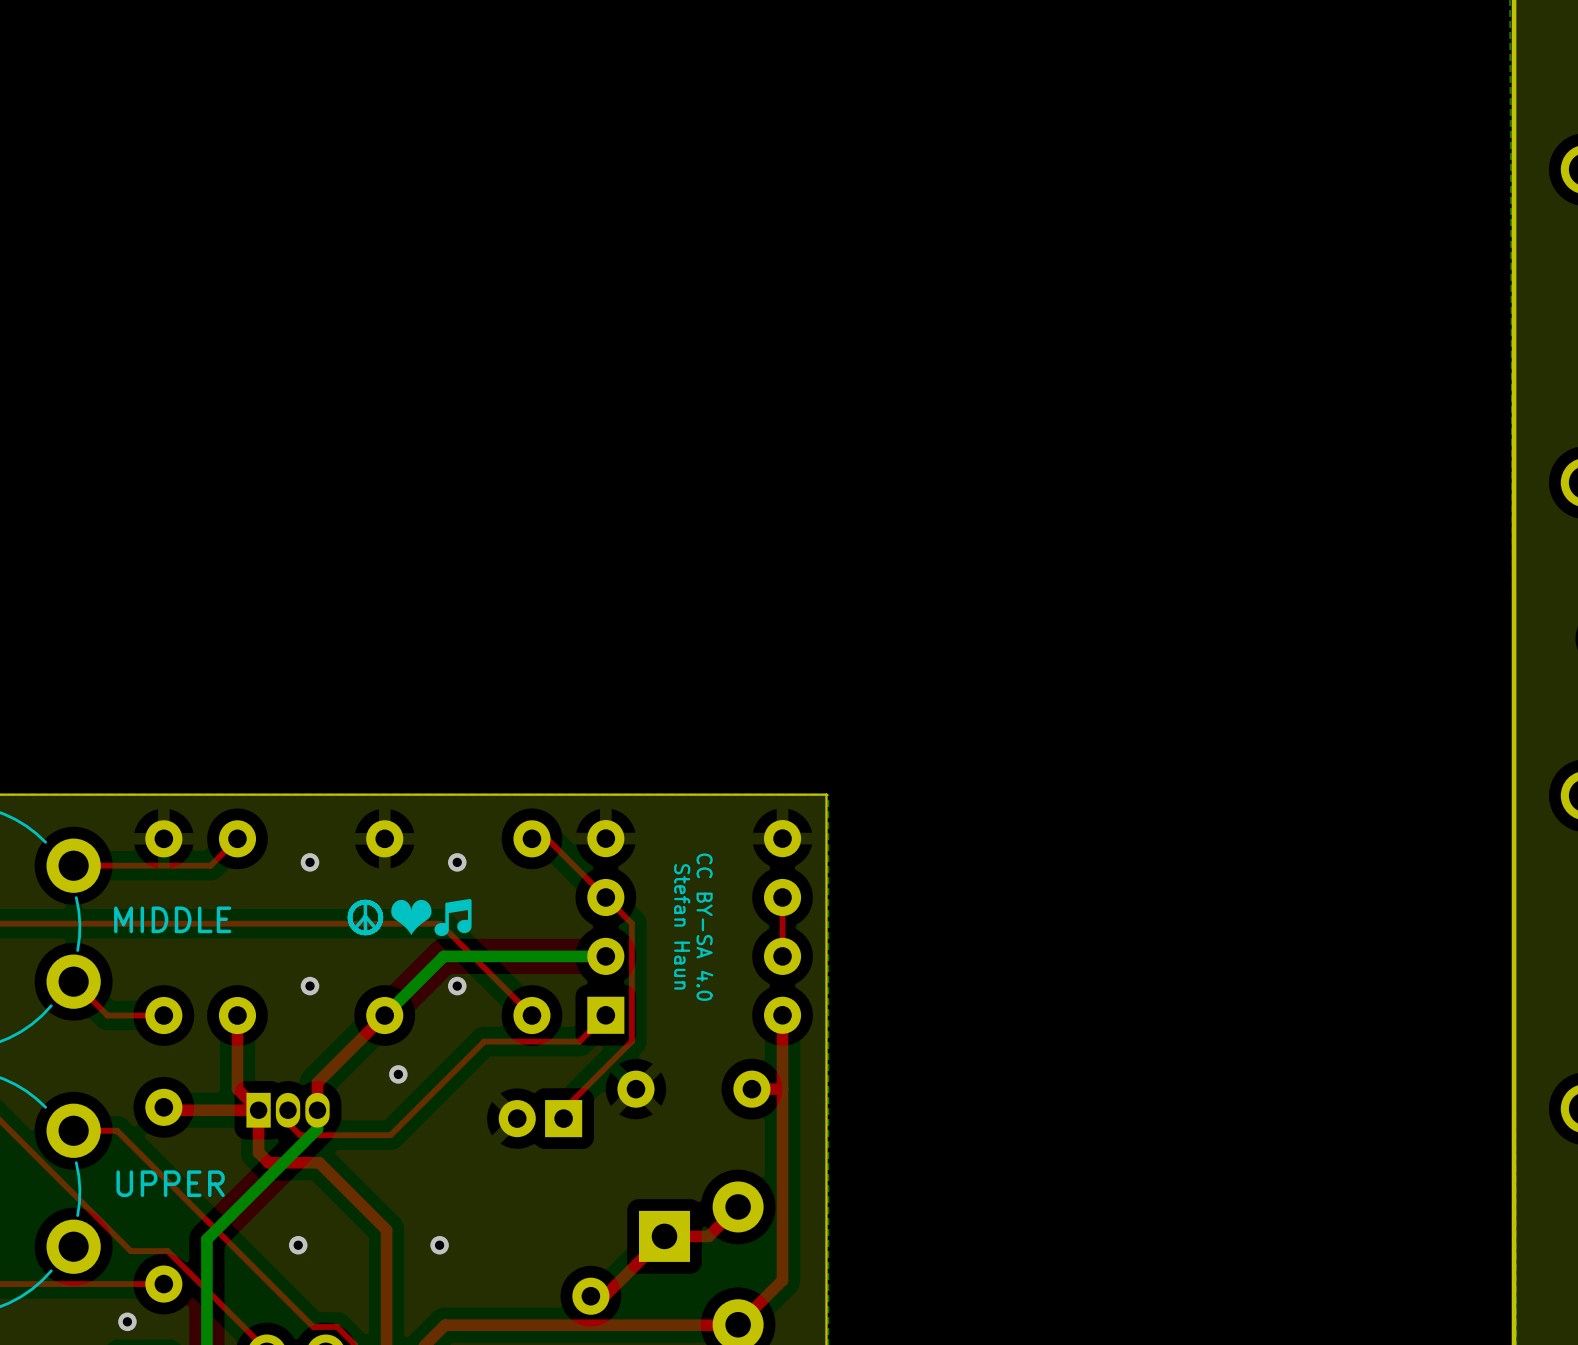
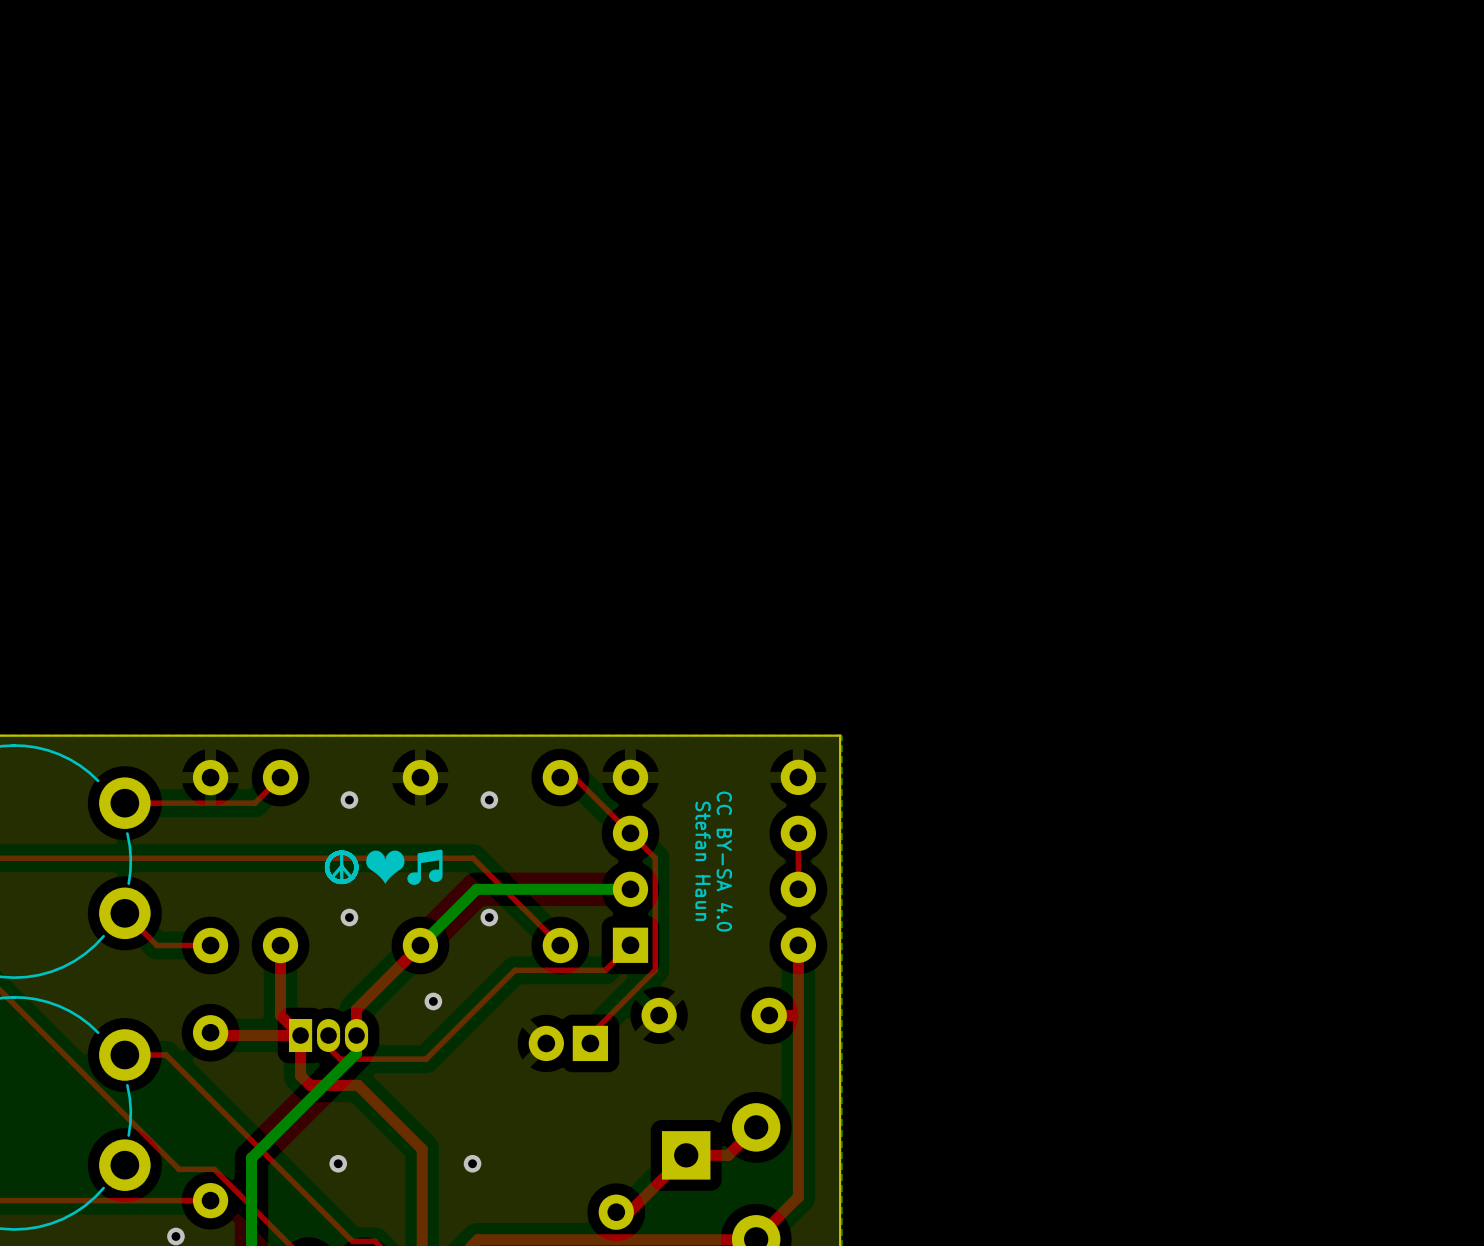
line: (367, 902) (355, 905) (350, 915) (353, 927) (363, 932) (375, 929) (380, 919) (377, 907) (367, 902) -> (343, 852) (332, 855) (327, 865) (329, 876) (339, 881) (350, 879) (356, 869) (353, 858) (343, 852)
line: (365, 903) (365, 931) -> (341, 853) (341, 880)
line: (365, 916) (355, 928) -> (341, 866) (332, 877)
line: (365, 916) (375, 928) -> (341, 865) (351, 877)
drawing position: (411, 917) -> (385, 867)
drawing position: (453, 917) -> (424, 867)
text: MIDDLE (172, 919) -> none
text: UPPER (170, 1183) -> none

